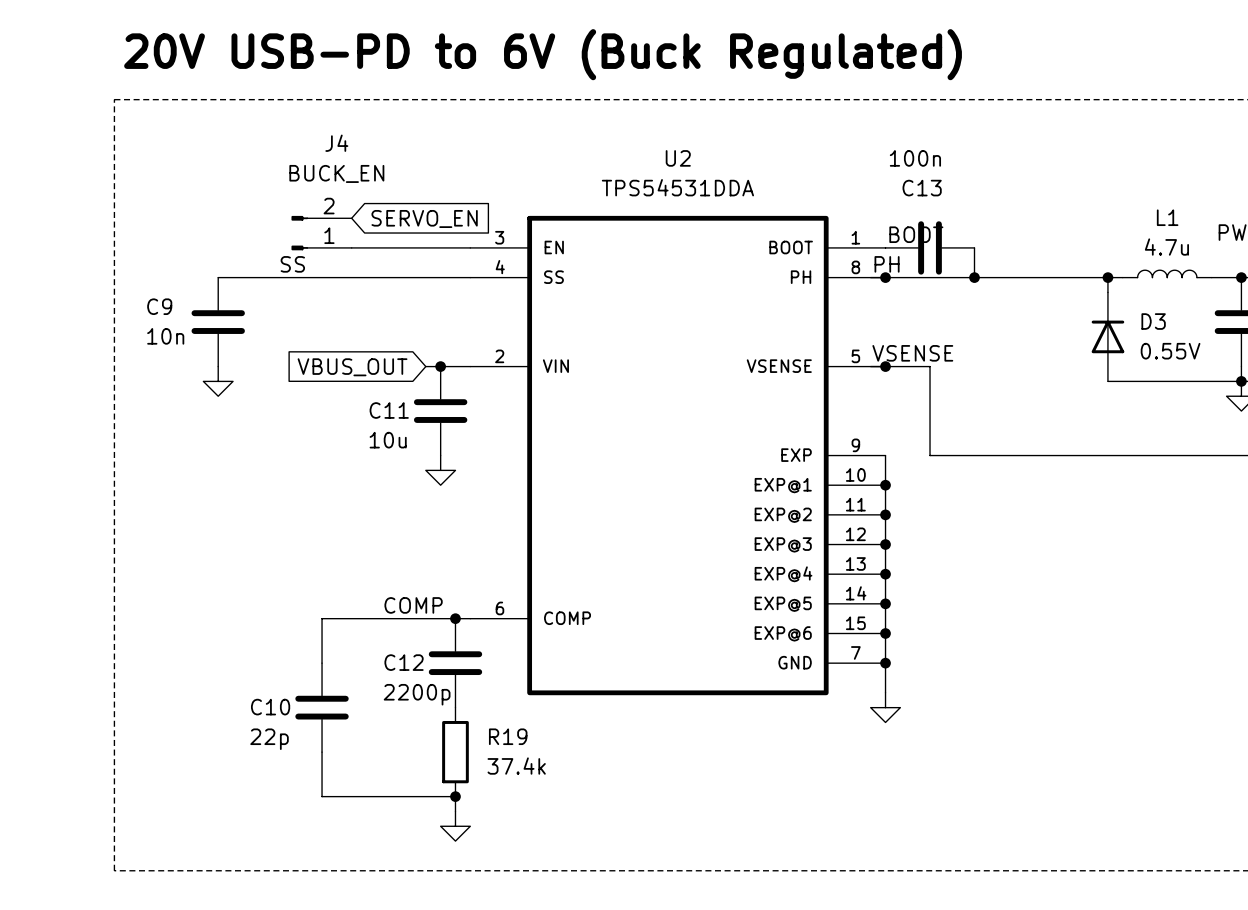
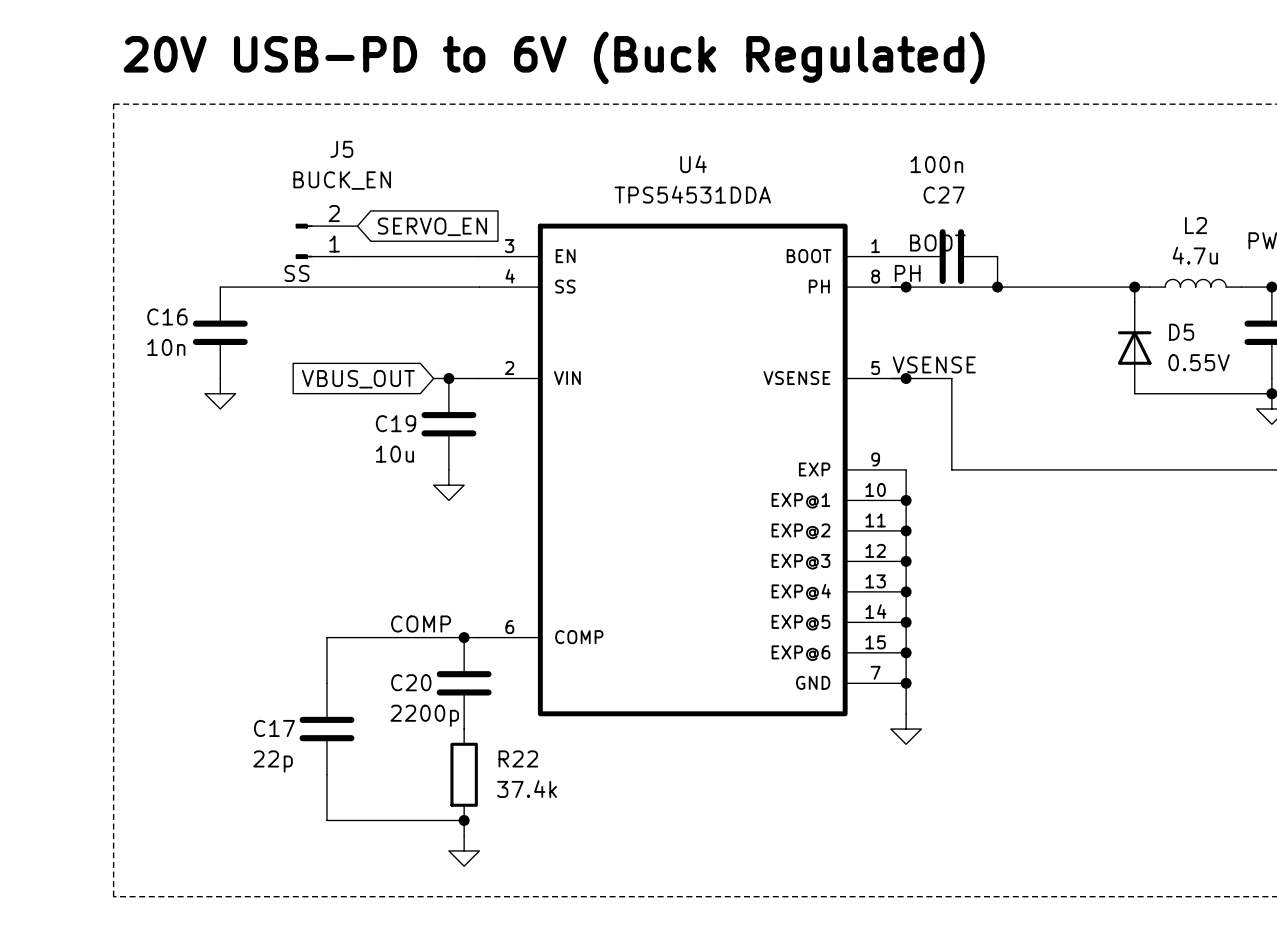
J4 name: J4 (336, 143) -> J5 (341, 149)
U2 name: U2 (678, 158) -> U4 (693, 164)
C13 name: C13 (922, 188) -> C27 (944, 195)
L1 name: L1 (1167, 217) -> L2 (1196, 225)
C9 name: C9 (159, 306) -> C16 (167, 316)
D3 name: D3 (1153, 321) -> D5 (1181, 332)
C11 name: C11 (389, 410) -> C19 (396, 423)
C12 name: C12 (404, 662) -> C20 (411, 682)
C10 name: C10 (270, 707) -> C17 (274, 728)
R19 name: R19 (508, 736) -> R22 (518, 758)

